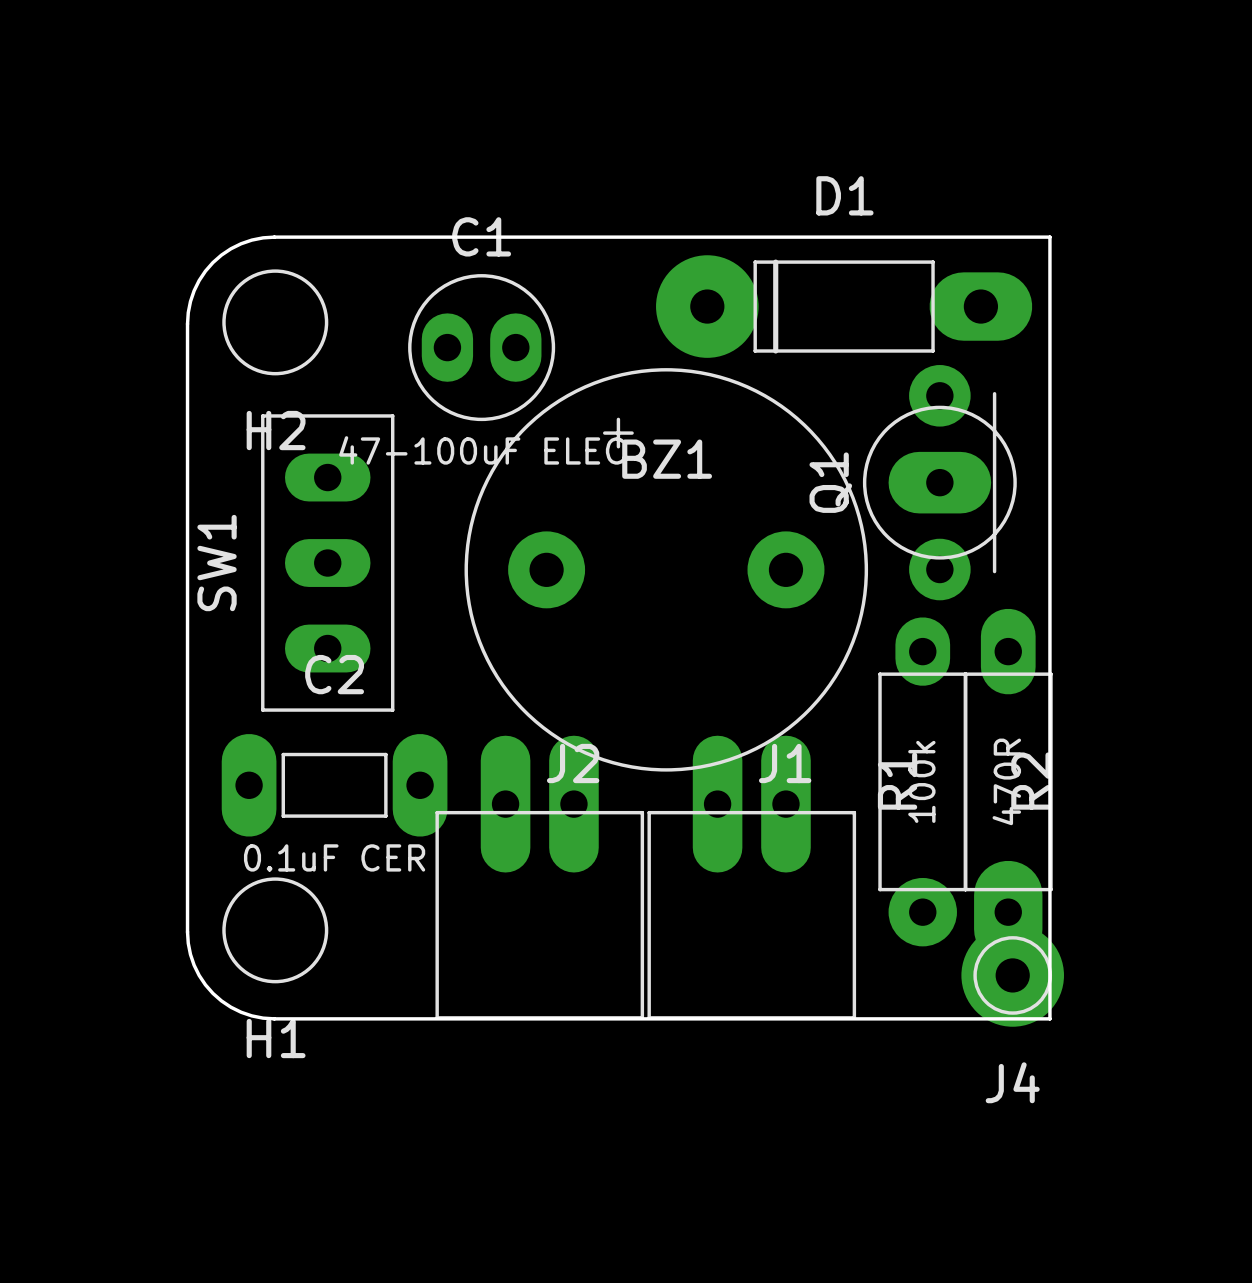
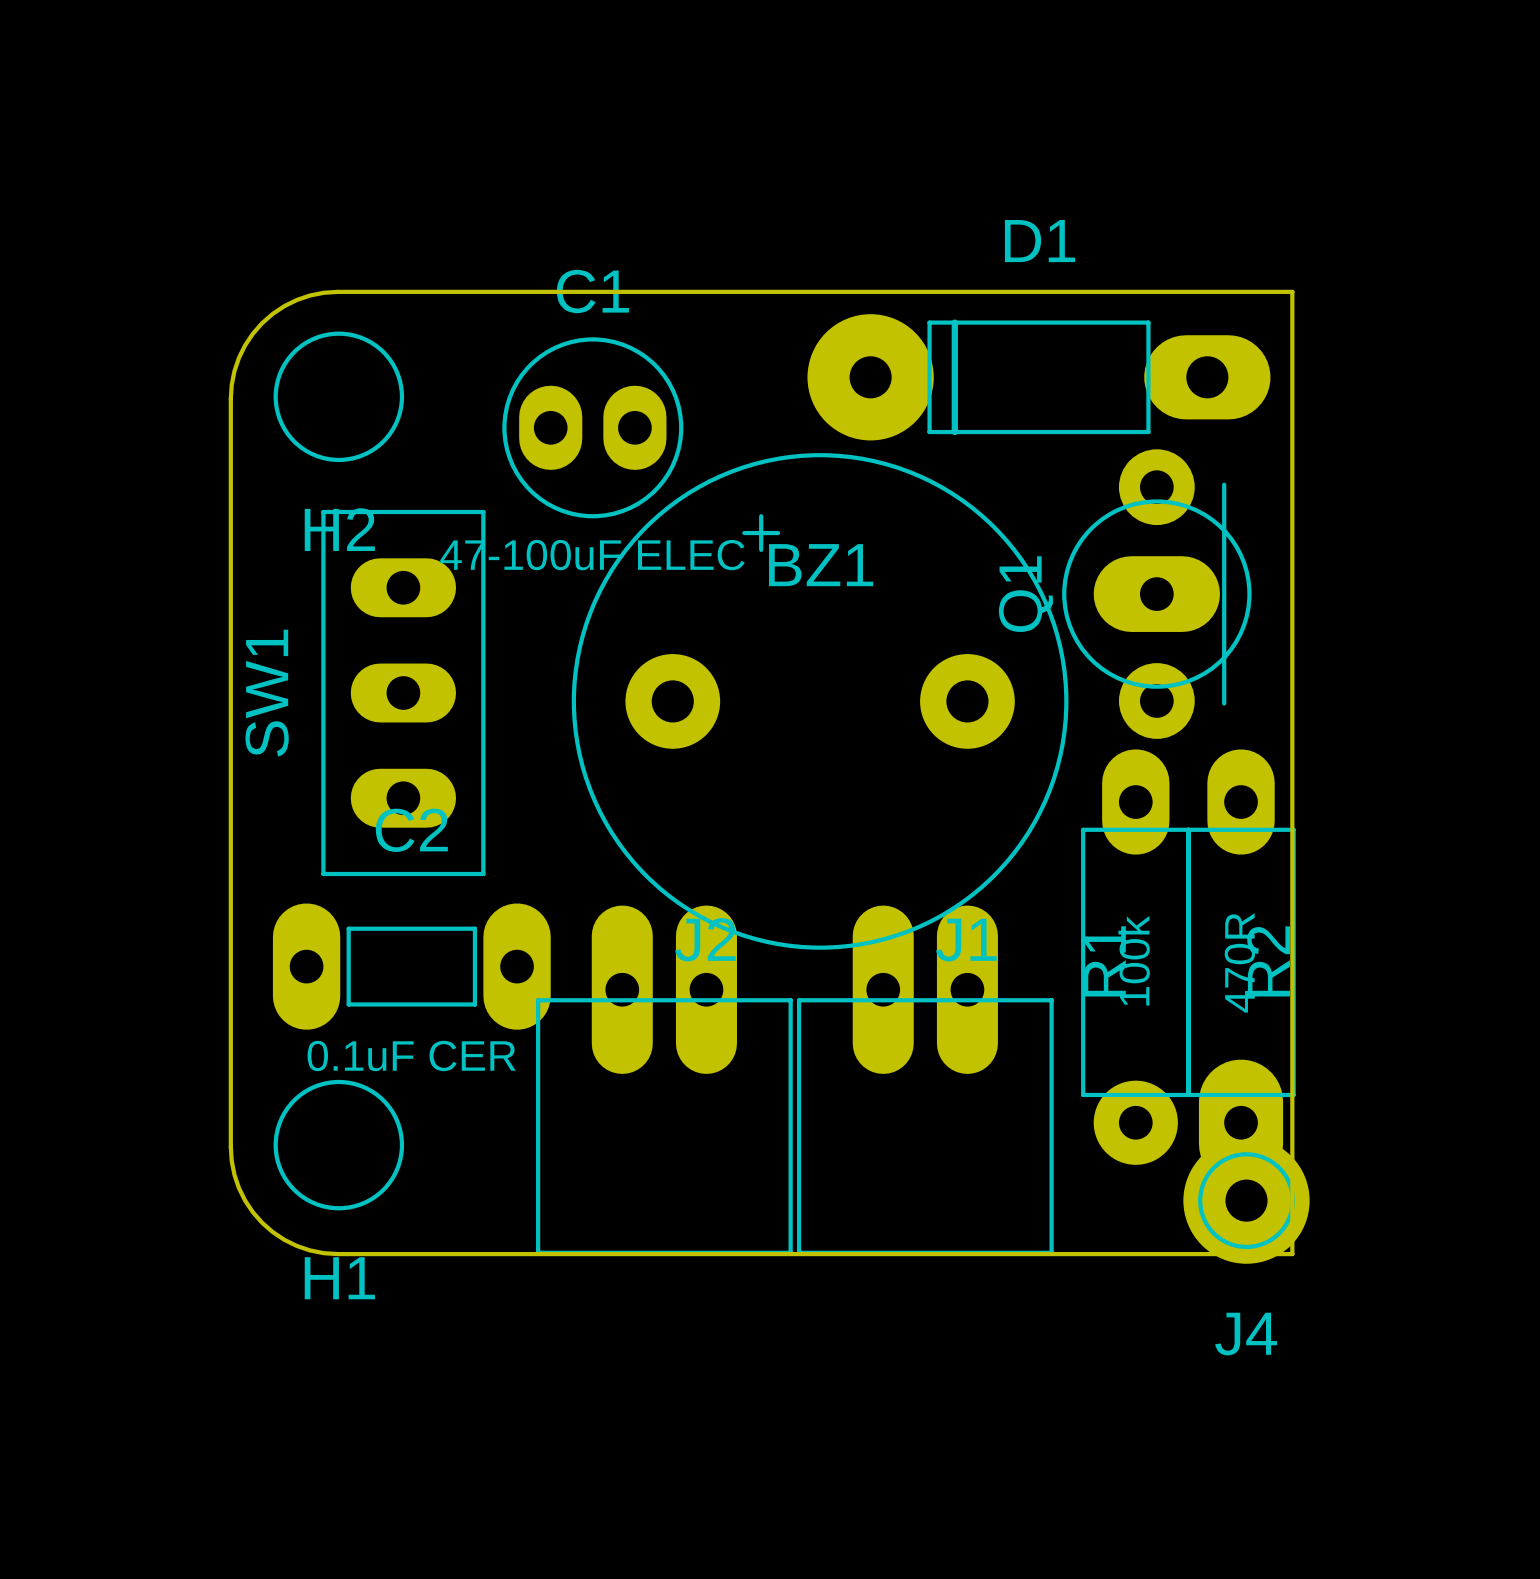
R2 footprint: [878, 617, 968, 947] -> [1081, 749, 1191, 1165]

